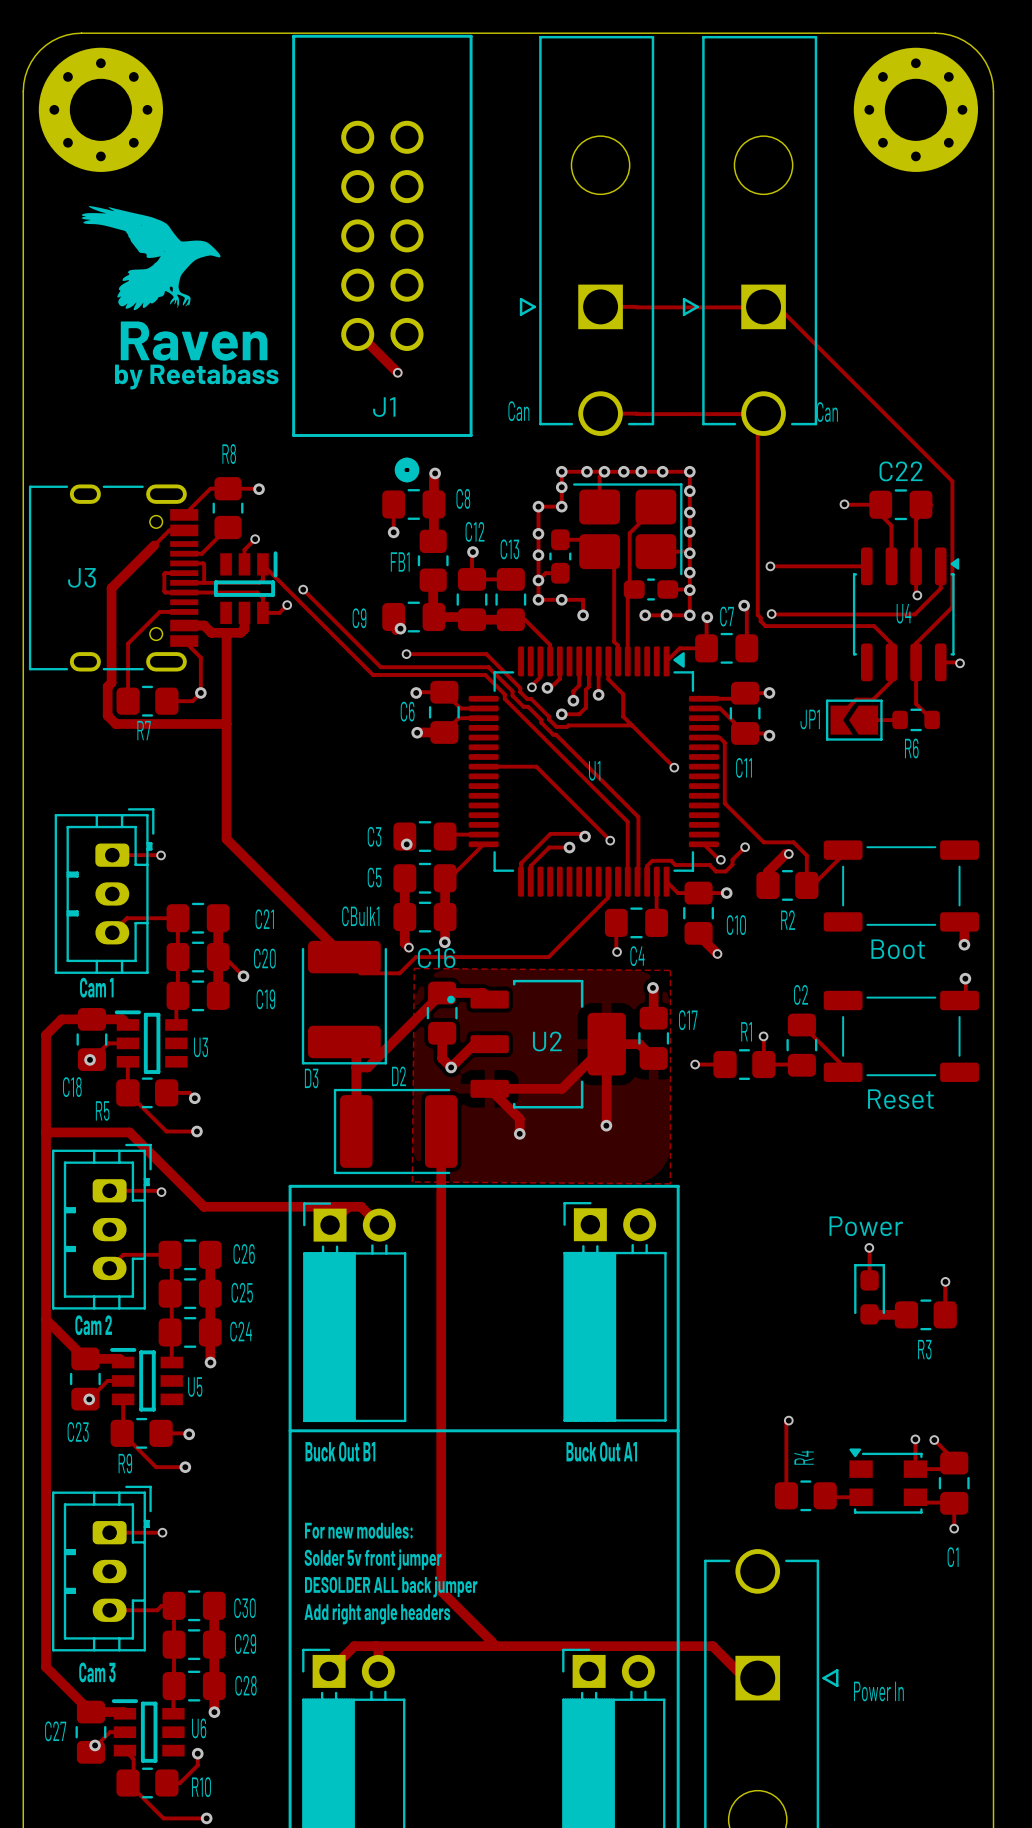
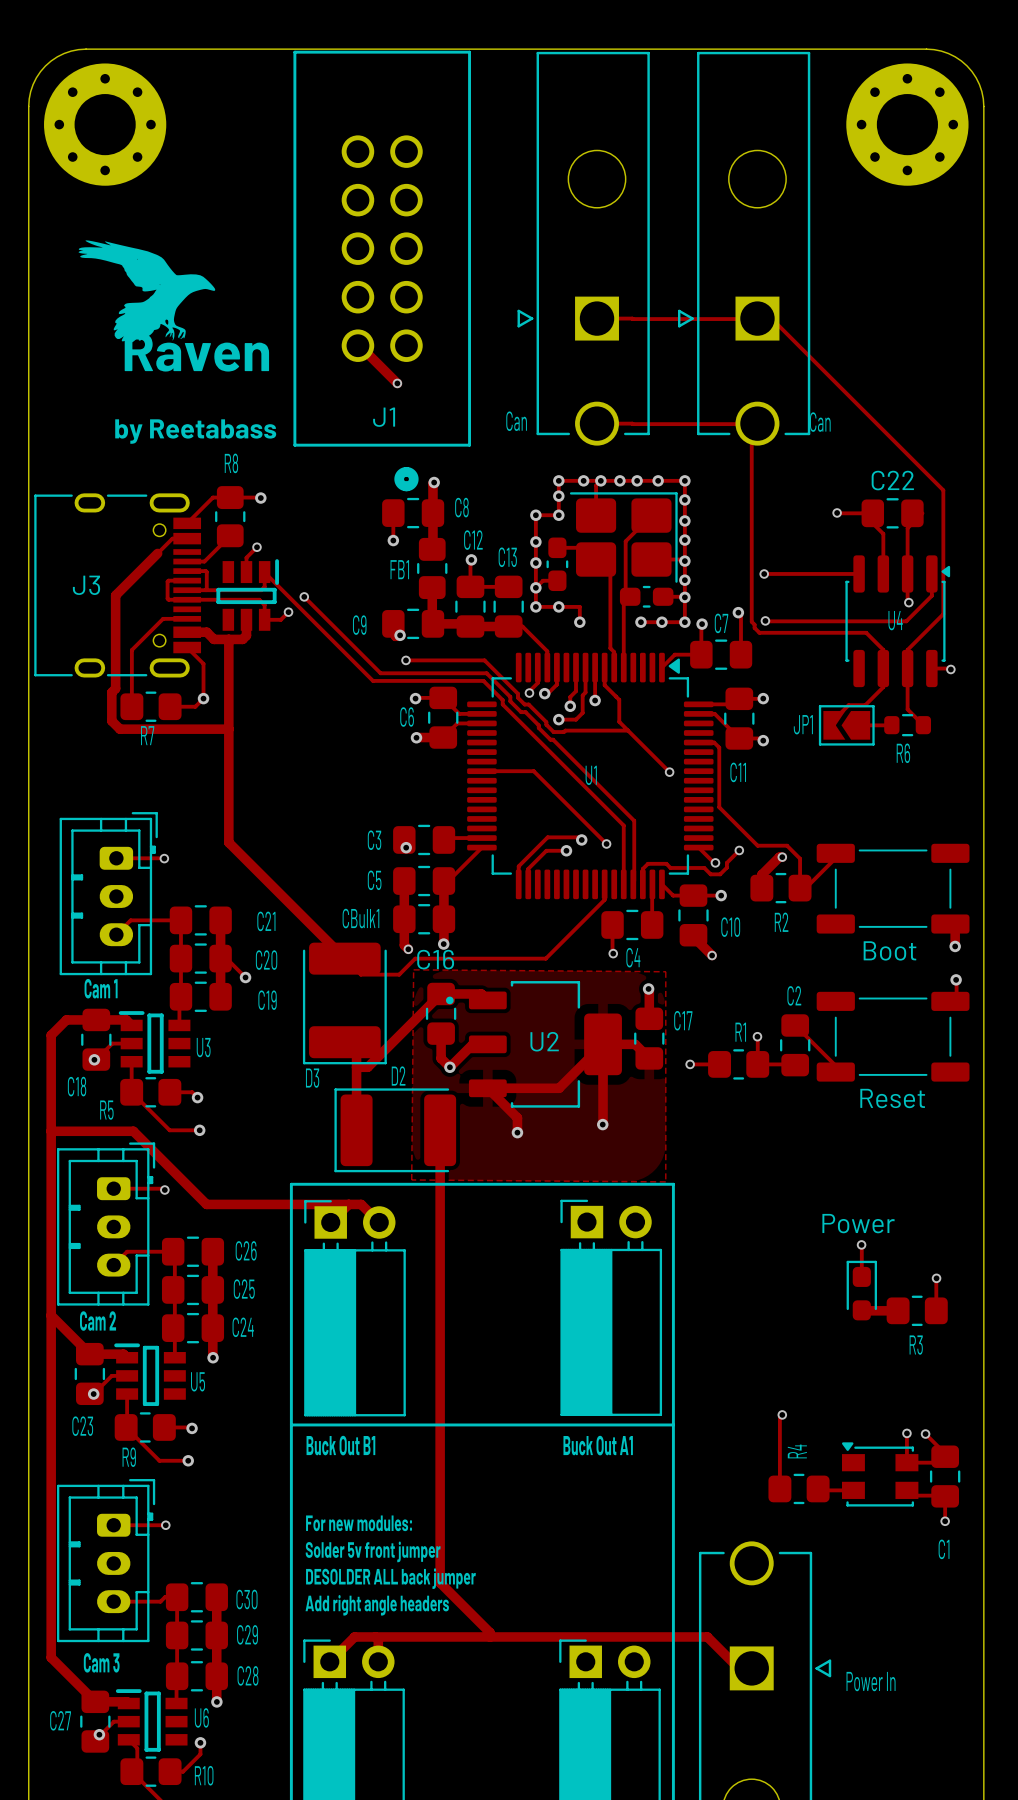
drawing position: (151, 258) -> (146, 291)
text position: by Reetabass (196, 377) -> by Reetabass (195, 431)

